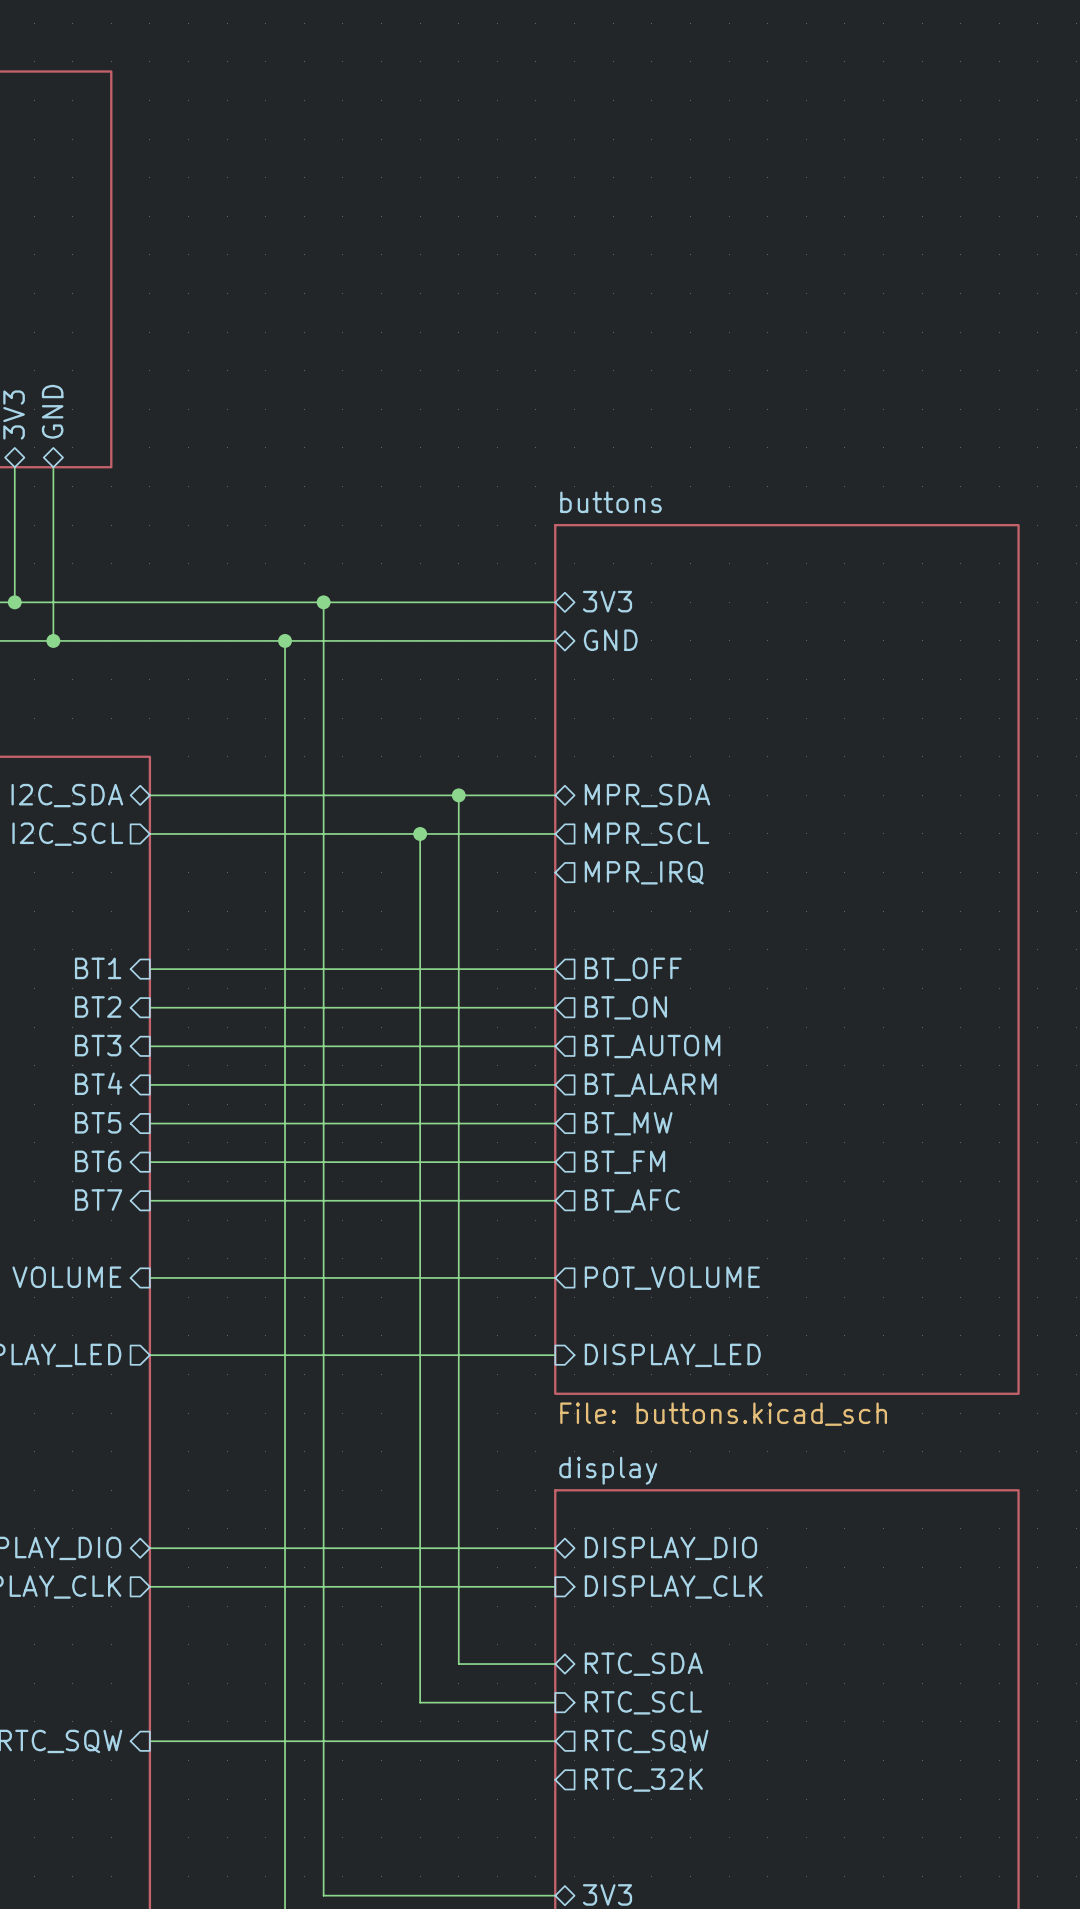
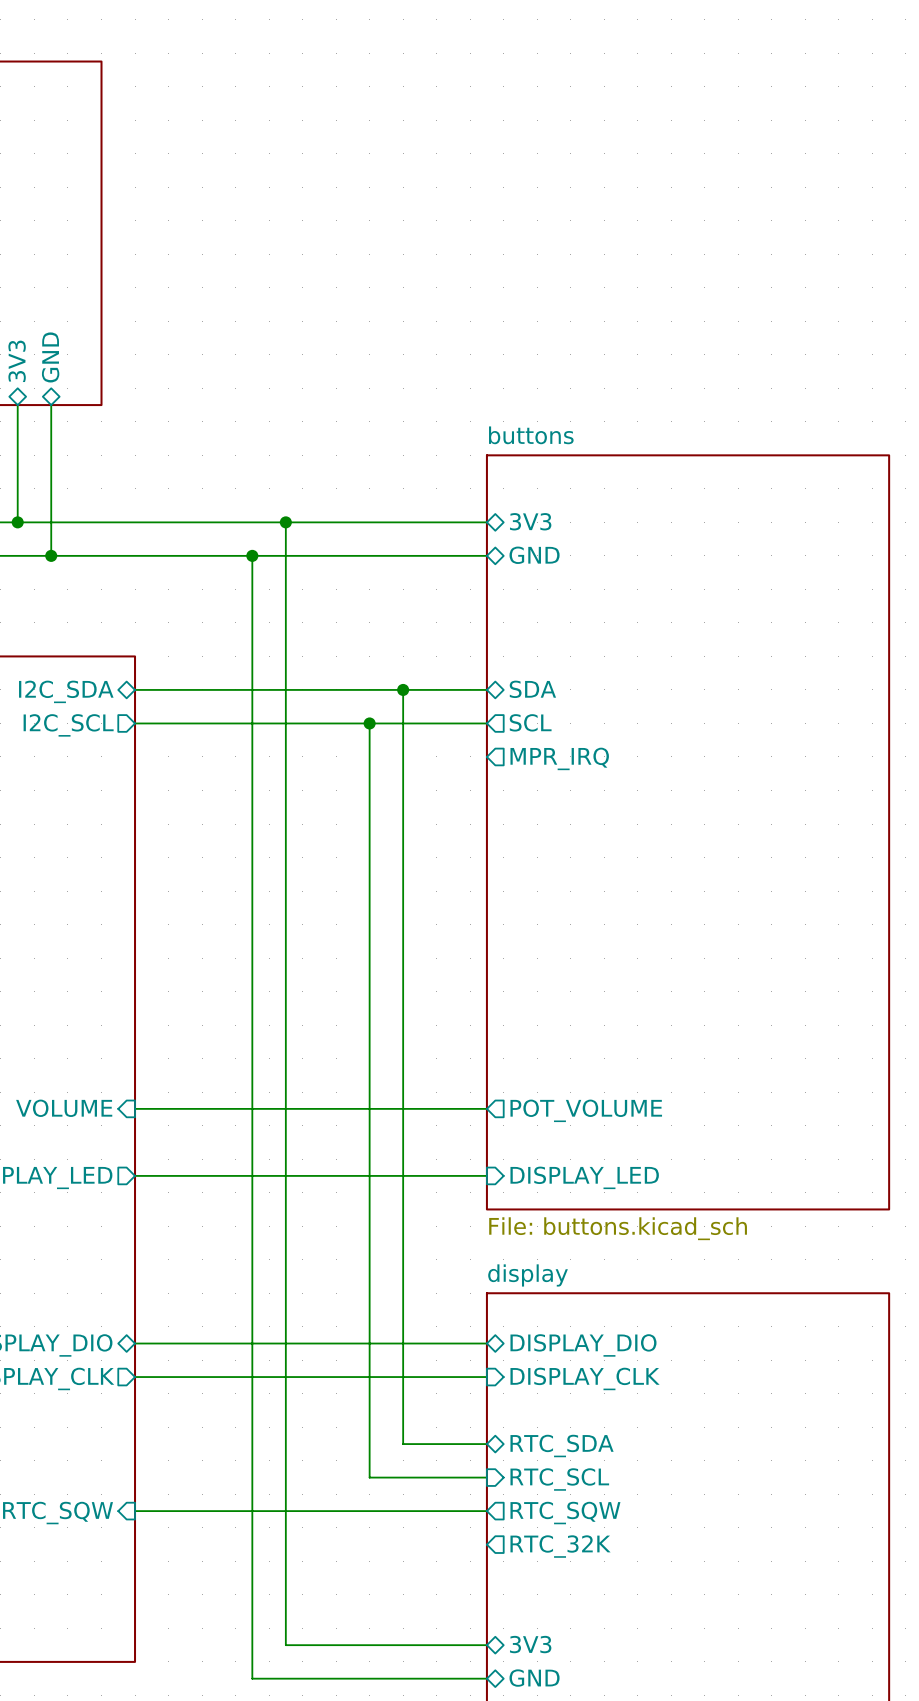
sheet pin: MPR_SDA (647, 795) -> SDA (532, 689)
sheet pin: MPR_SCL (647, 834) -> SCL (530, 722)
sheet pin: BT1 (98, 968) -> none
wire: (149, 969) (555, 969) -> none
sheet pin: BT_OFF (633, 969) -> none
sheet pin: BT2 (98, 1006) -> none
wire: (149, 1007) (555, 1007) -> none
sheet pin: BT_ON (625, 1007) -> none
sheet pin: BT3 (98, 1045) -> none
wire: (149, 1046) (555, 1046) -> none
sheet pin: BT_AUTOM (652, 1046) -> none
sheet pin: BT4 (98, 1083) -> none
wire: (149, 1084) (555, 1084) -> none
sheet pin: BT_ALARM (650, 1085) -> none
sheet pin: BT5 (98, 1122) -> none
wire: (149, 1123) (555, 1123) -> none
sheet pin: BT_MW (628, 1123) -> none
sheet pin: BT6 (98, 1161) -> none
wire: (149, 1162) (555, 1162) -> none
sheet pin: BT_FM (624, 1162) -> none
sheet pin: BT7 (98, 1200) -> none
wire: (149, 1200) (555, 1200) -> none
sheet pin: BT_AFC (632, 1200) -> none

